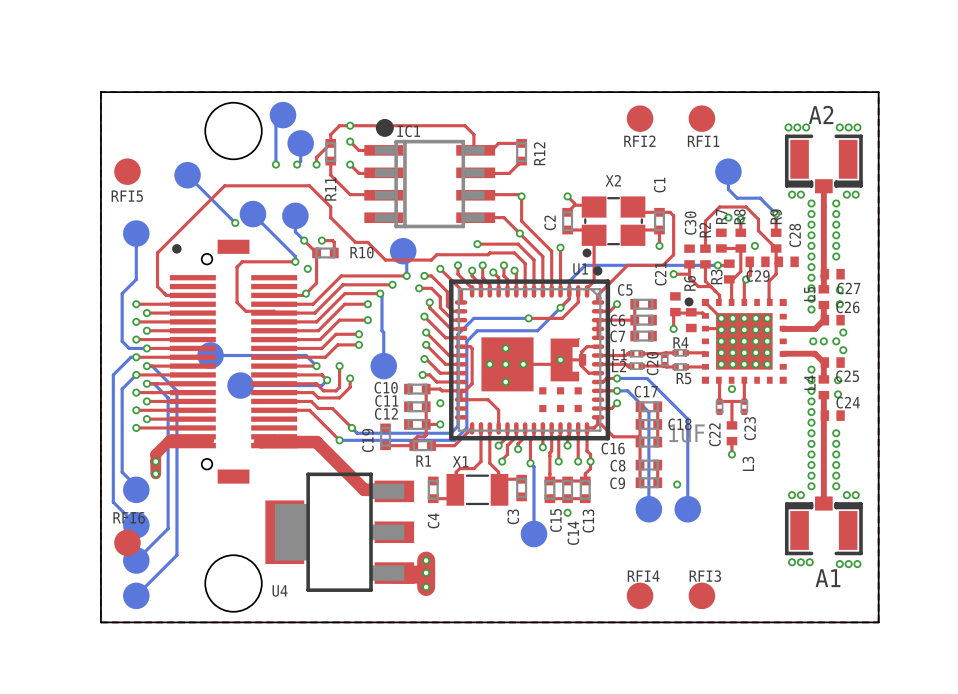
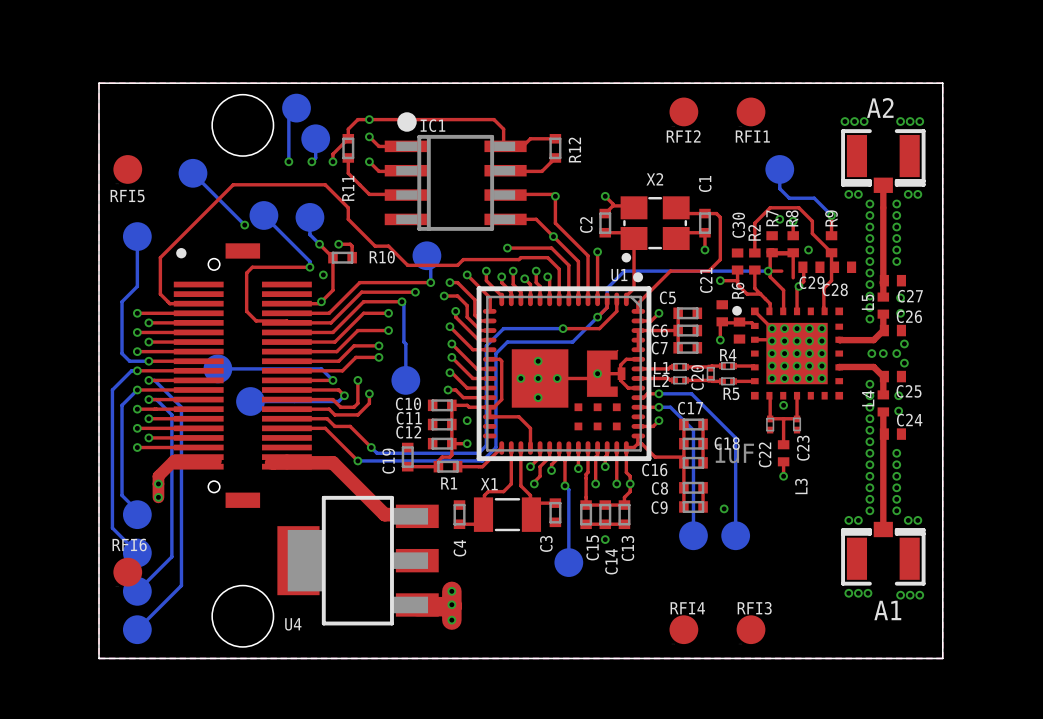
C28 name rotation: 0° (795, 235) -> 90° clockwise (835, 289)
C28 name position: C28 (795, 235) -> C28 (835, 289)
R3: (729, 271) -> none
top track: (740, 271) (732, 279) (729, 279) -> none
top track: (731, 279) (731, 302) -> (793, 253) (772, 253) (770, 251) (770, 276) (783, 290) (783, 311)

